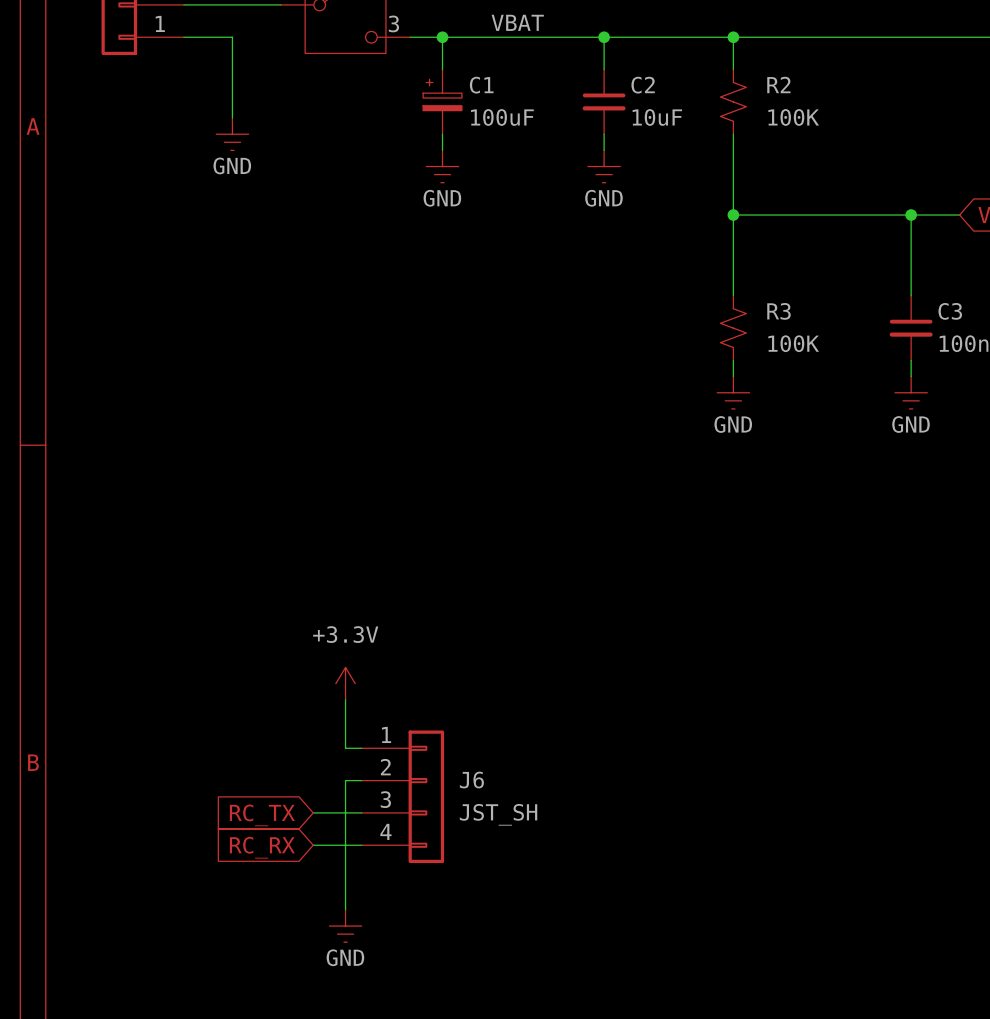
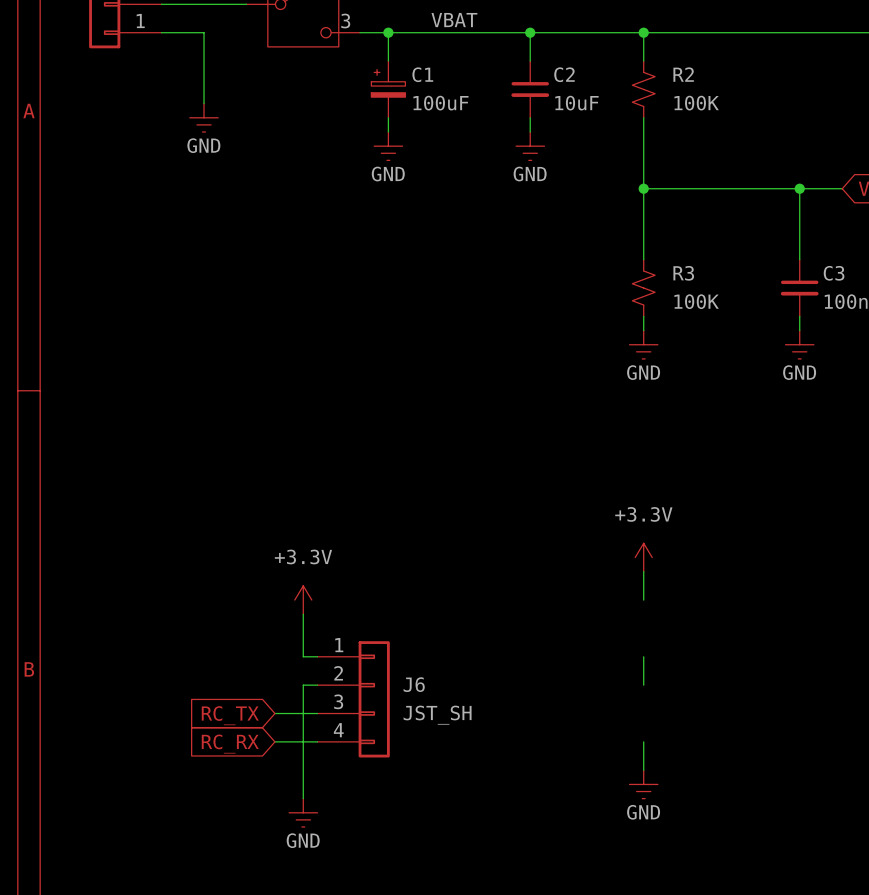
power symbol: none -> +3.3V (643, 557)
wire: none -> (643, 571) (643, 600)
wire: none -> (643, 656) (643, 685)
wire: none -> (643, 741) (643, 770)
power symbol: none -> GND (643, 784)

